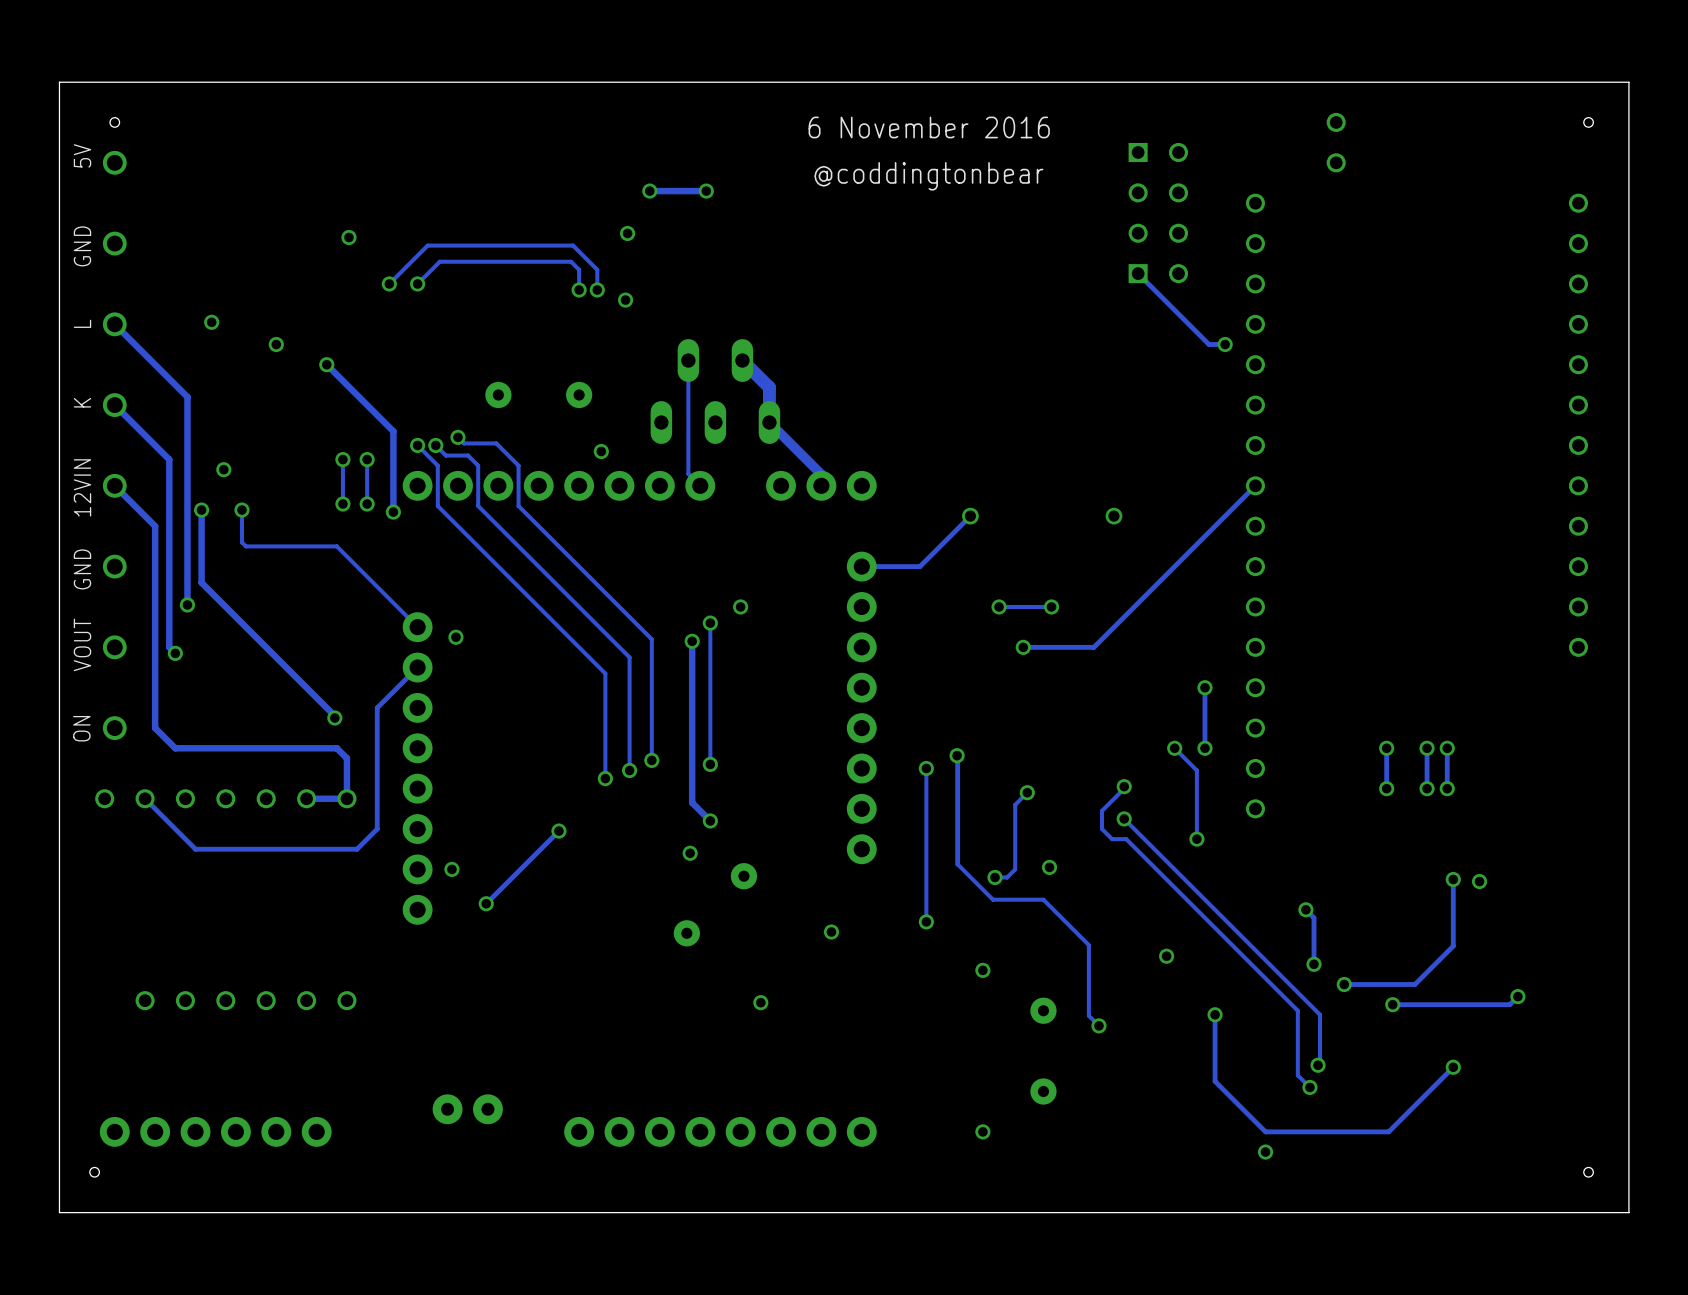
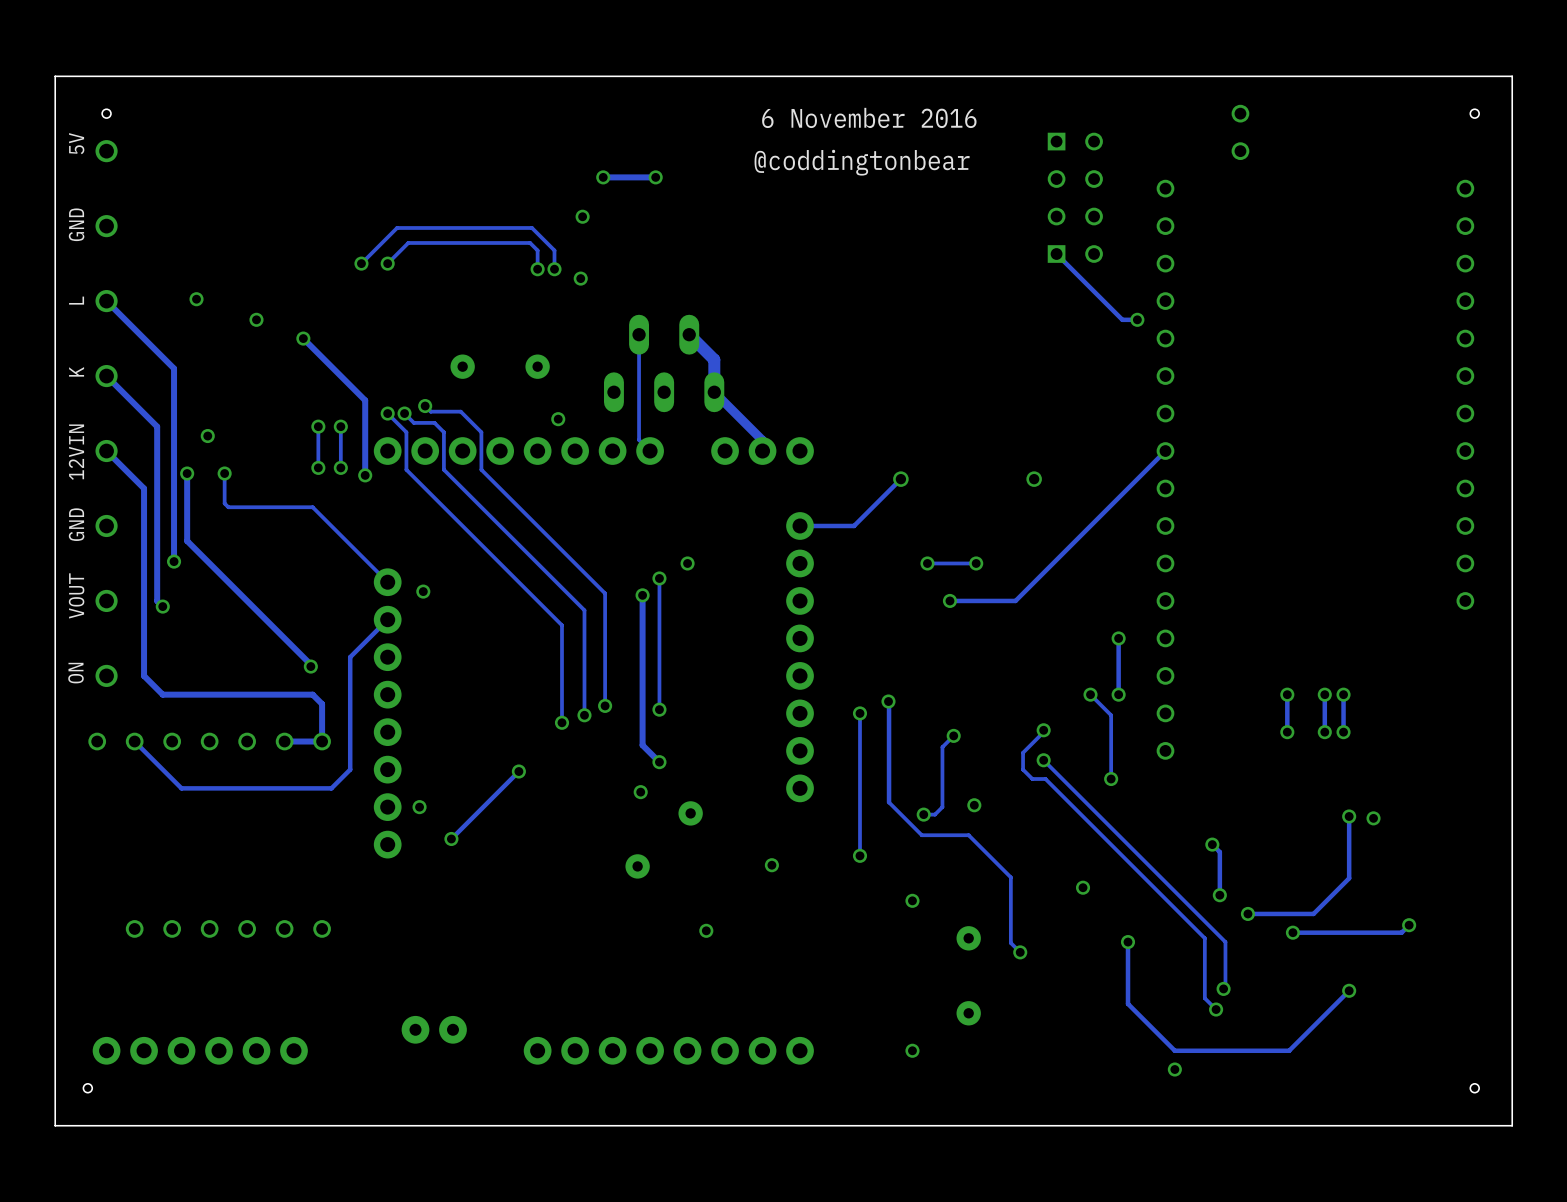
via: (348, 237) -> none

